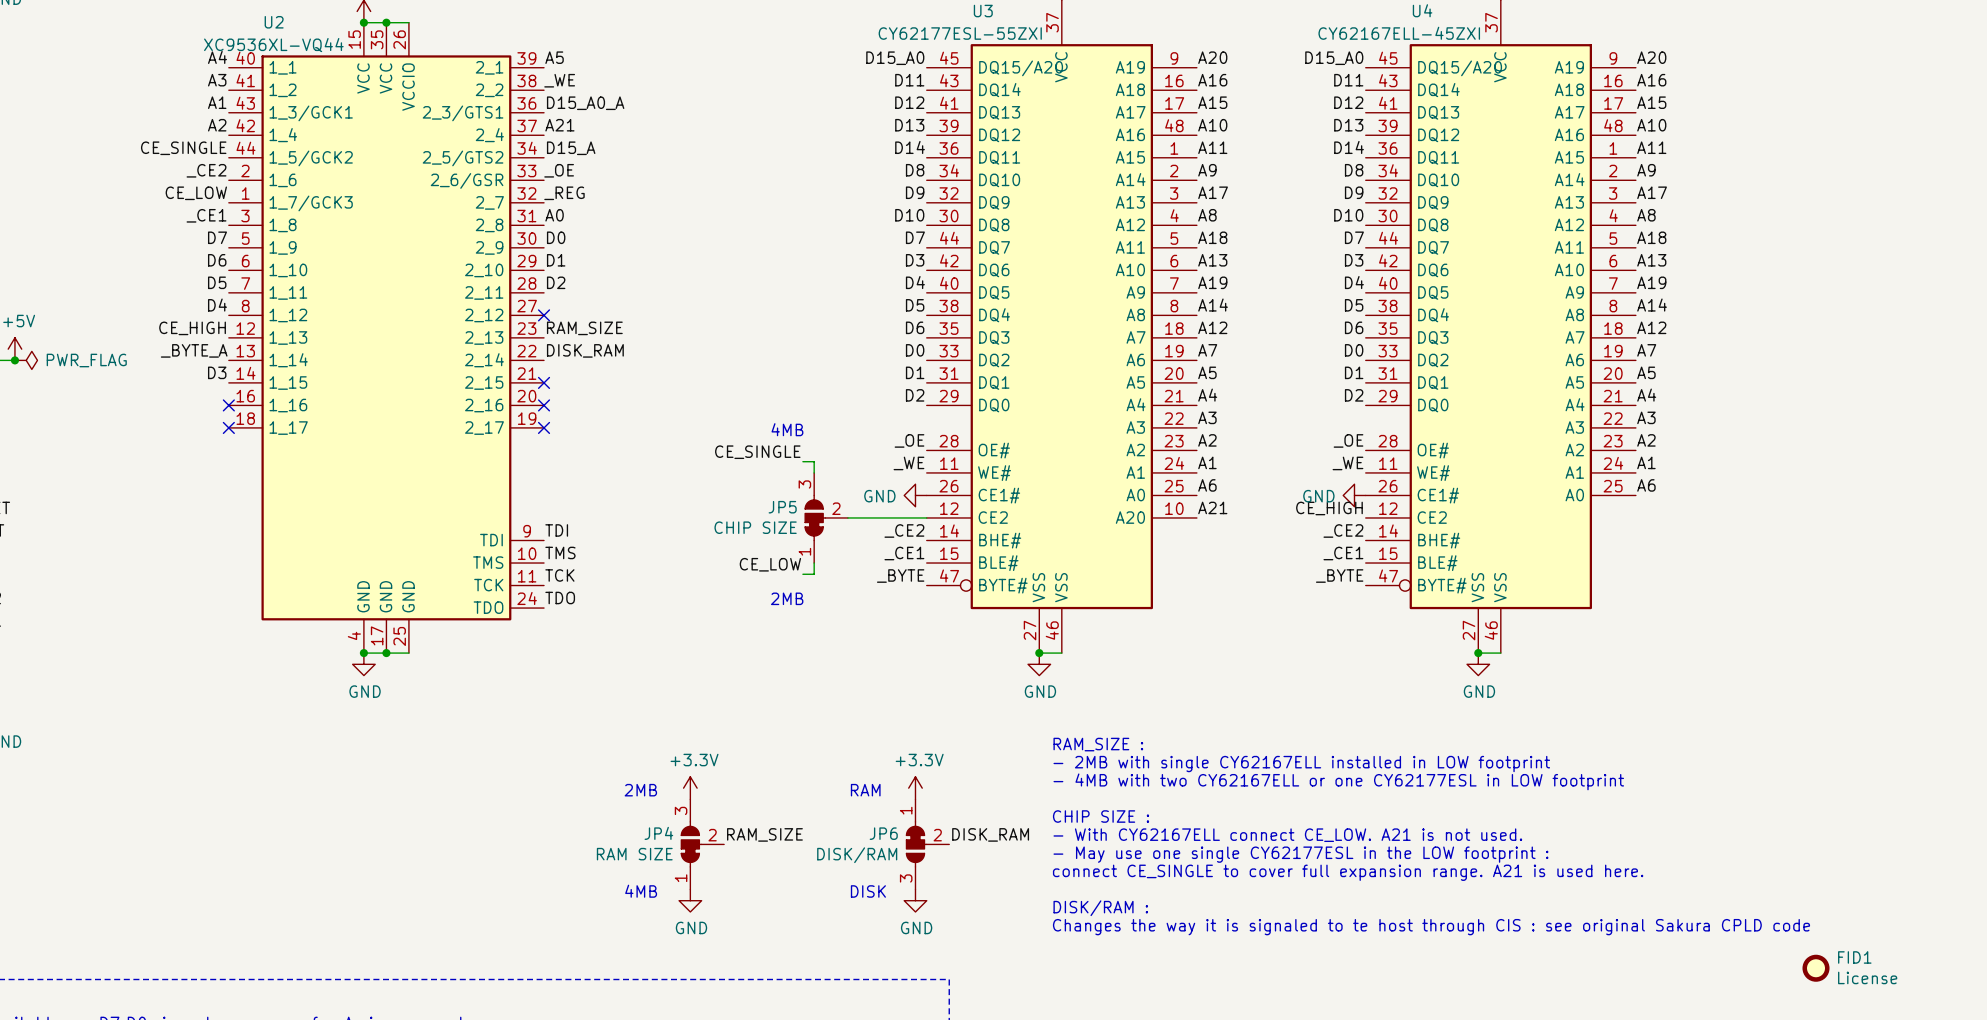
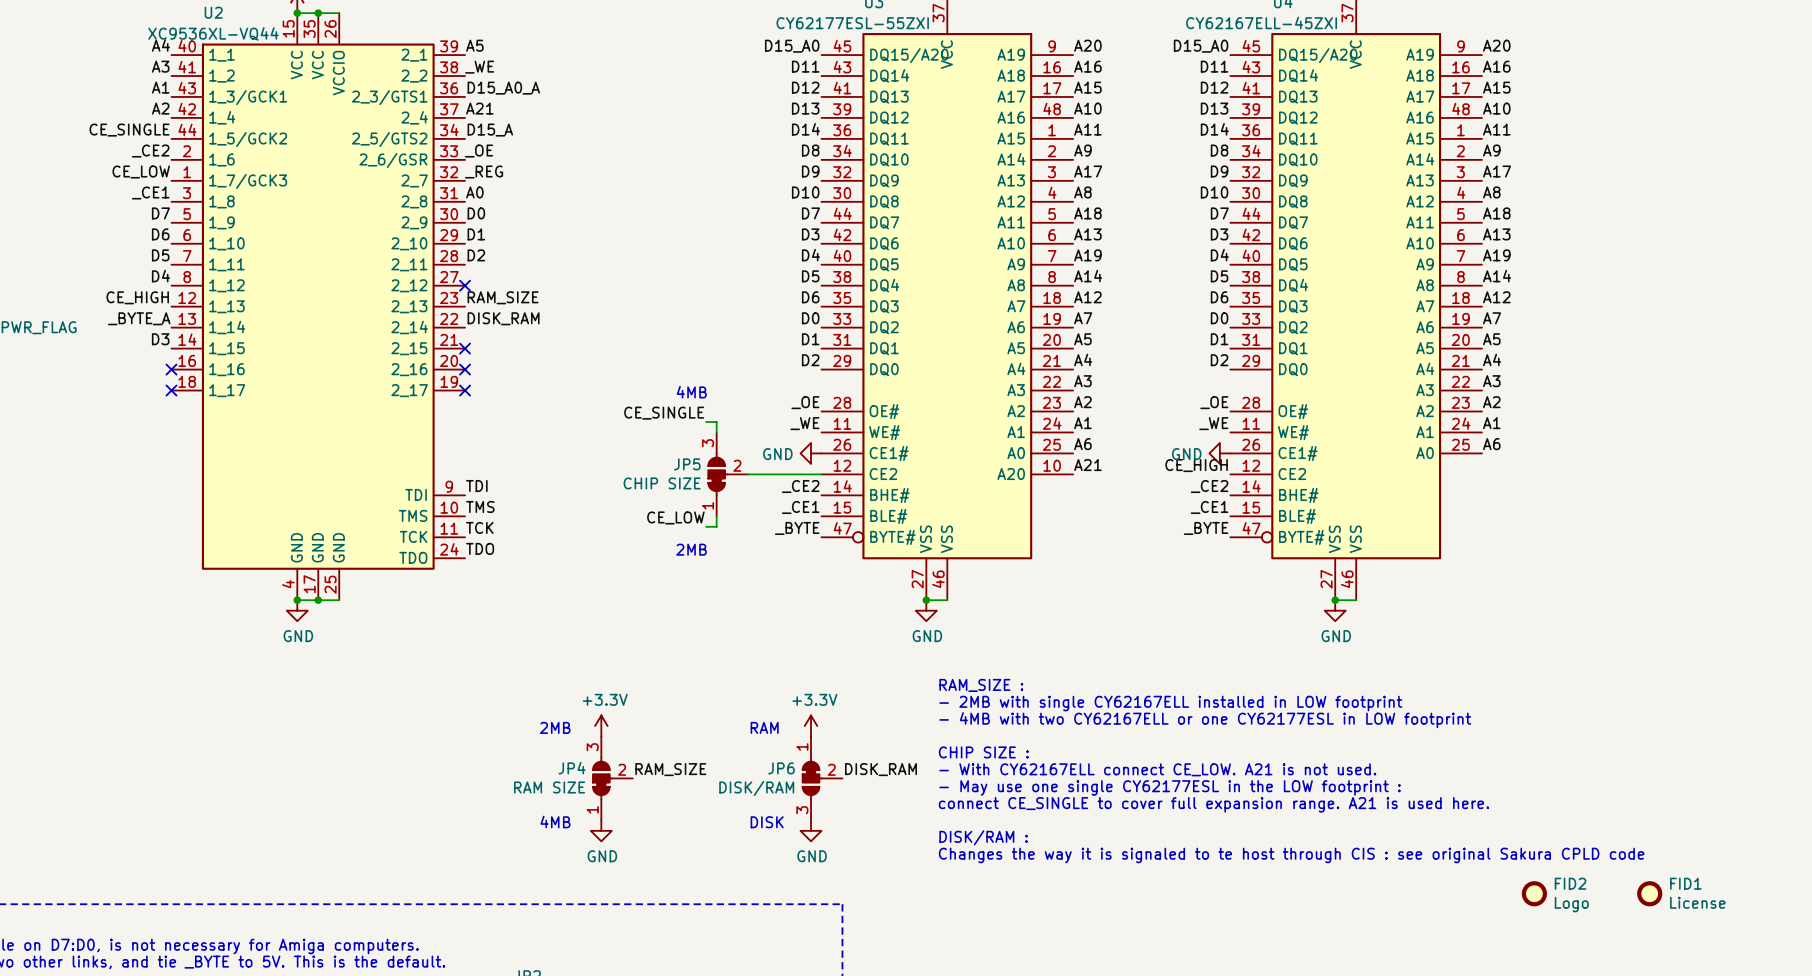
FID2: none -> Logo (1534, 893)

